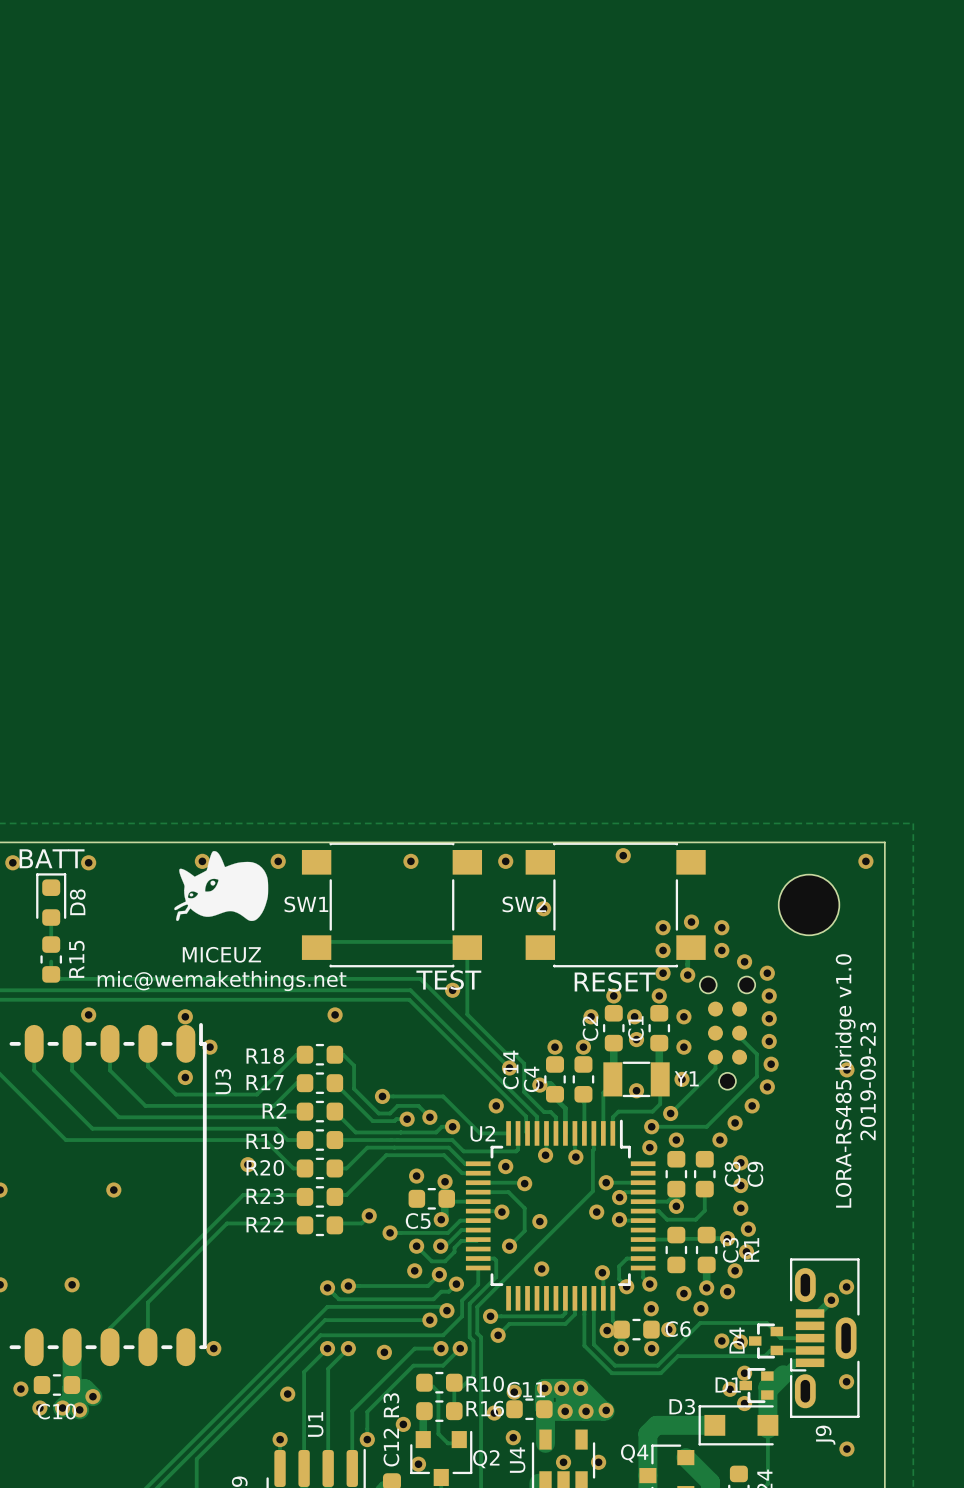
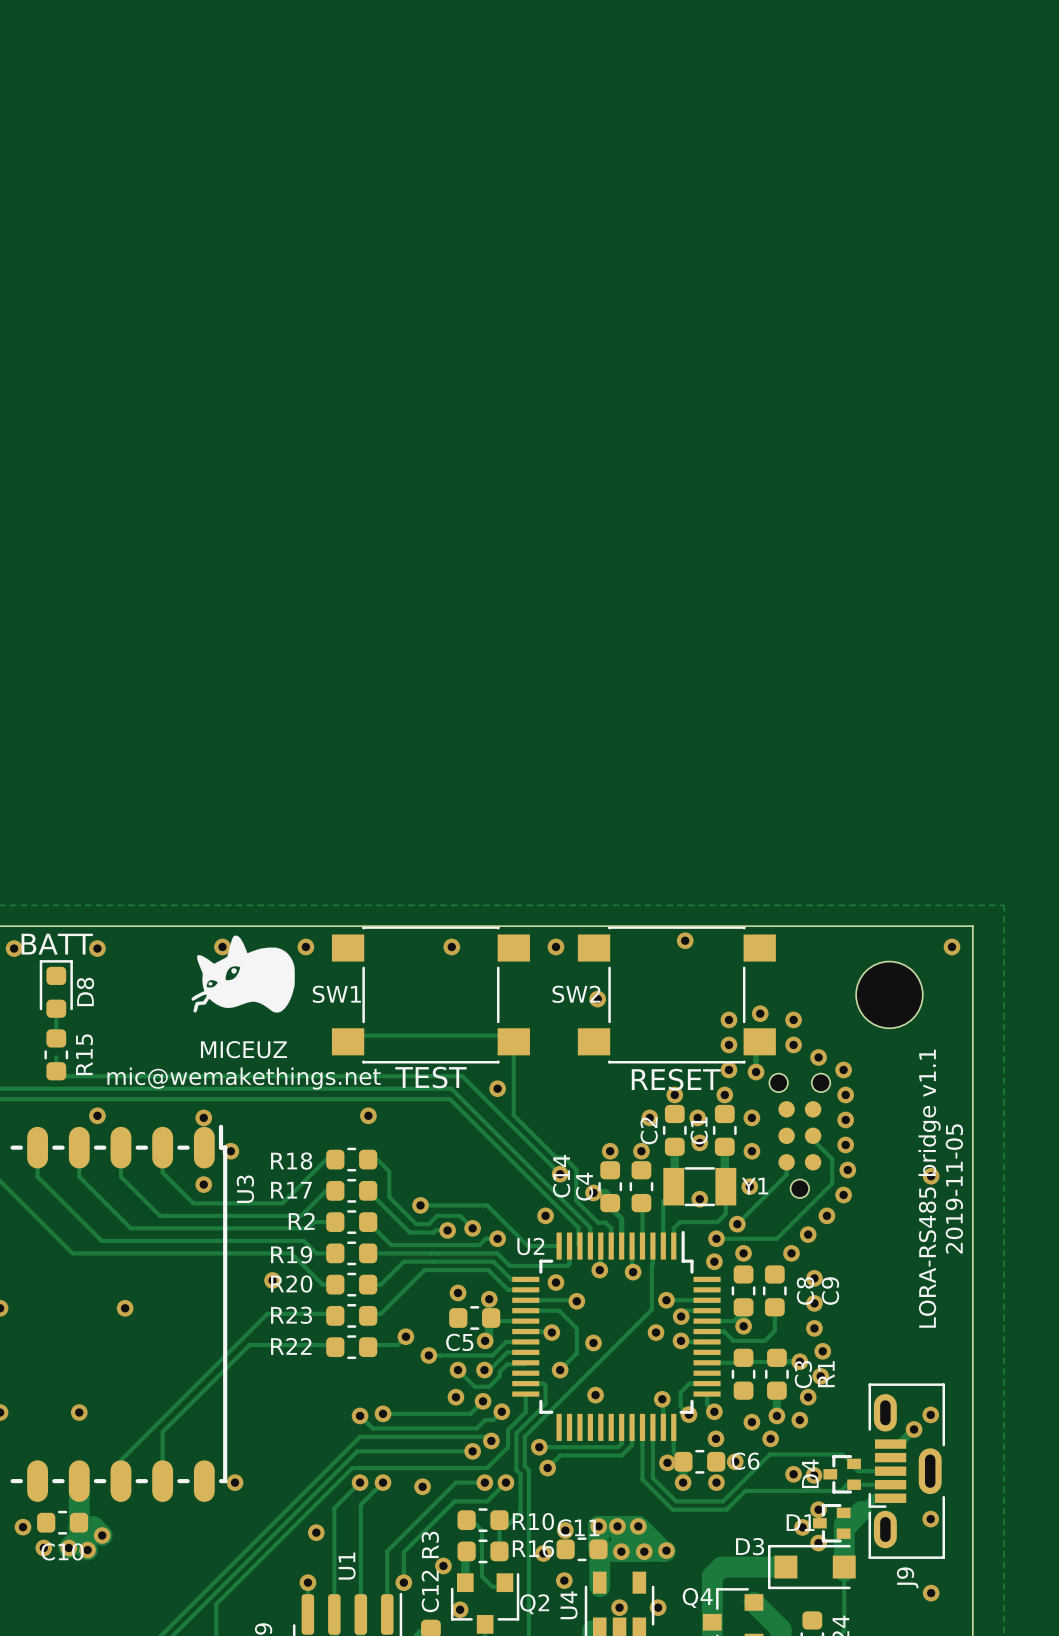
text position: TEST (448, 980) -> TEST (430, 1077)
text: LORA-RS485 bridge v1.0 (845, 1080) -> LORA-RS485 bridge v1.1 (929, 1188)
text: 2019-09-23 (868, 1081) -> 2019-11-05 (954, 1188)

